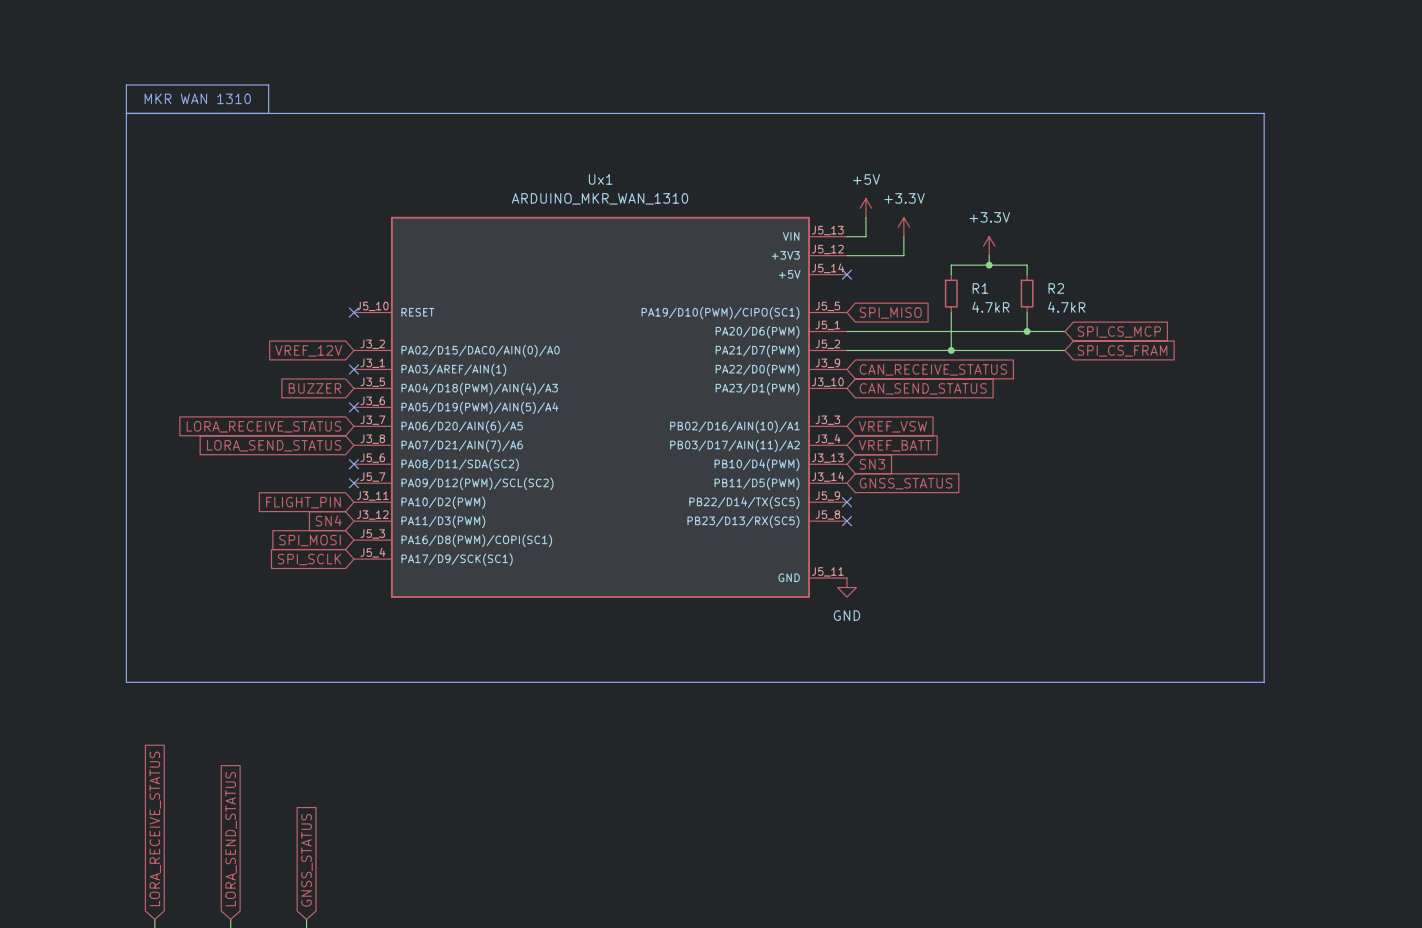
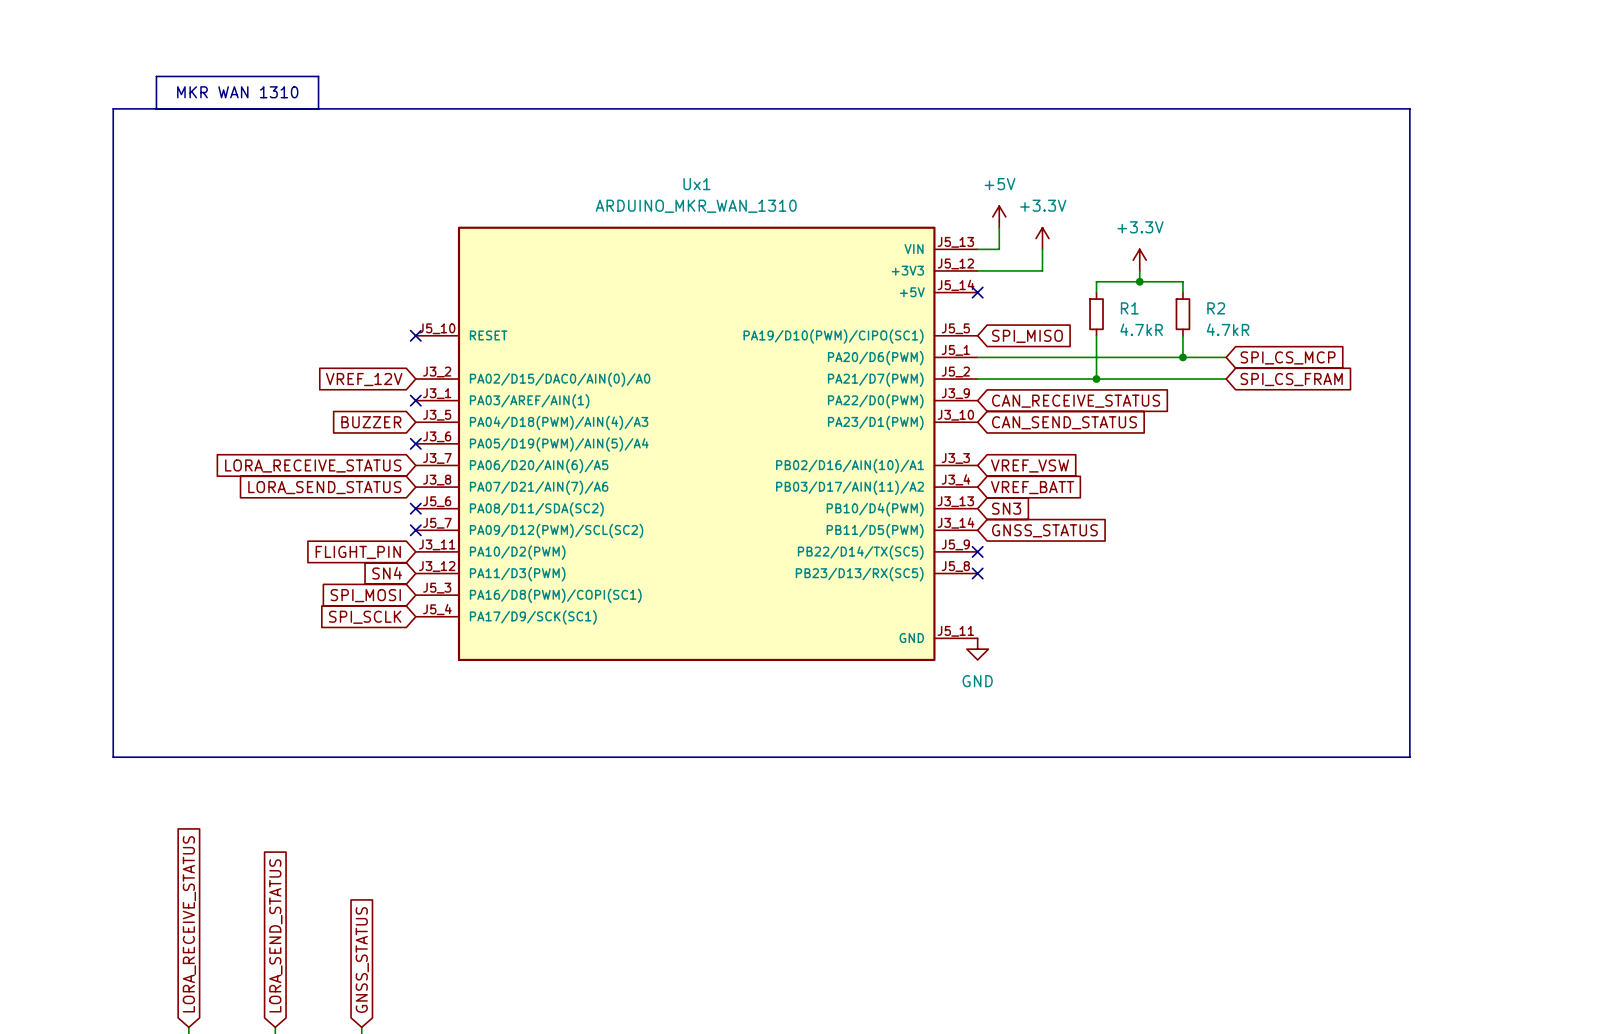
line: (126, 113) (126, 682) -> (156, 108) (113, 108) (113, 757) (156, 757)
line: (1226, 113) (1264, 113) (1264, 682) (1226, 682) -> (1409, 108) (1409, 757)

